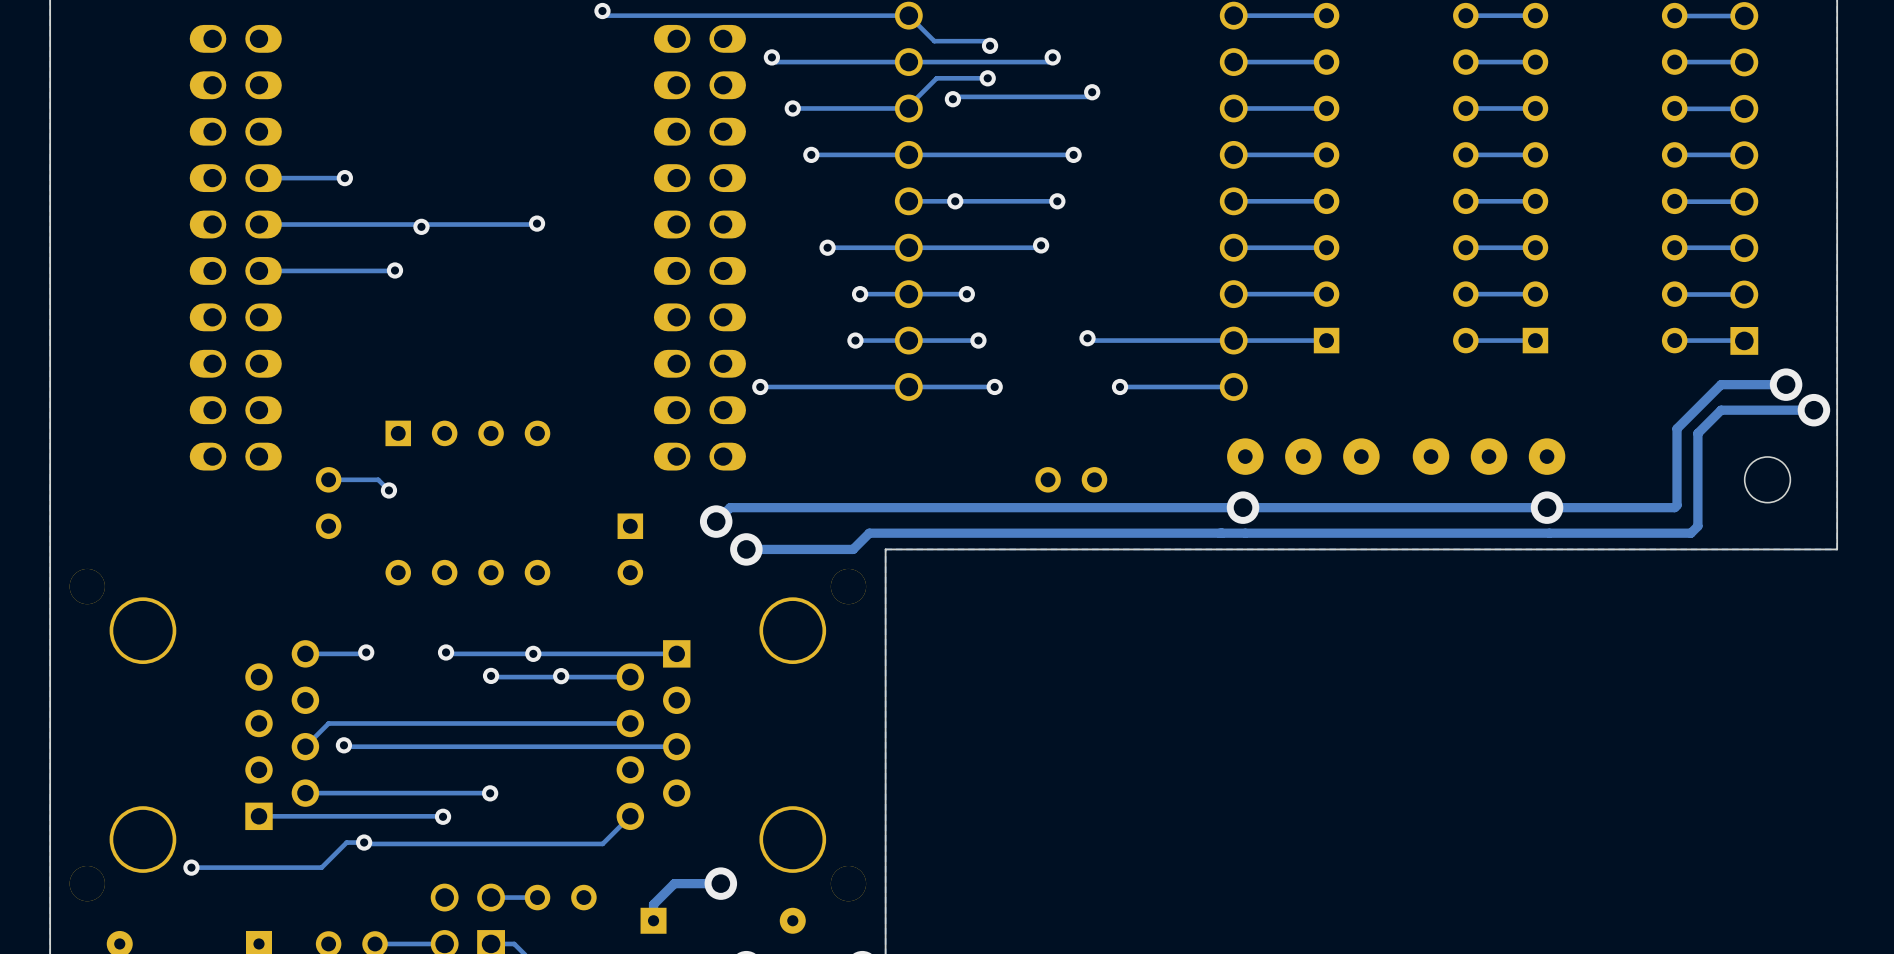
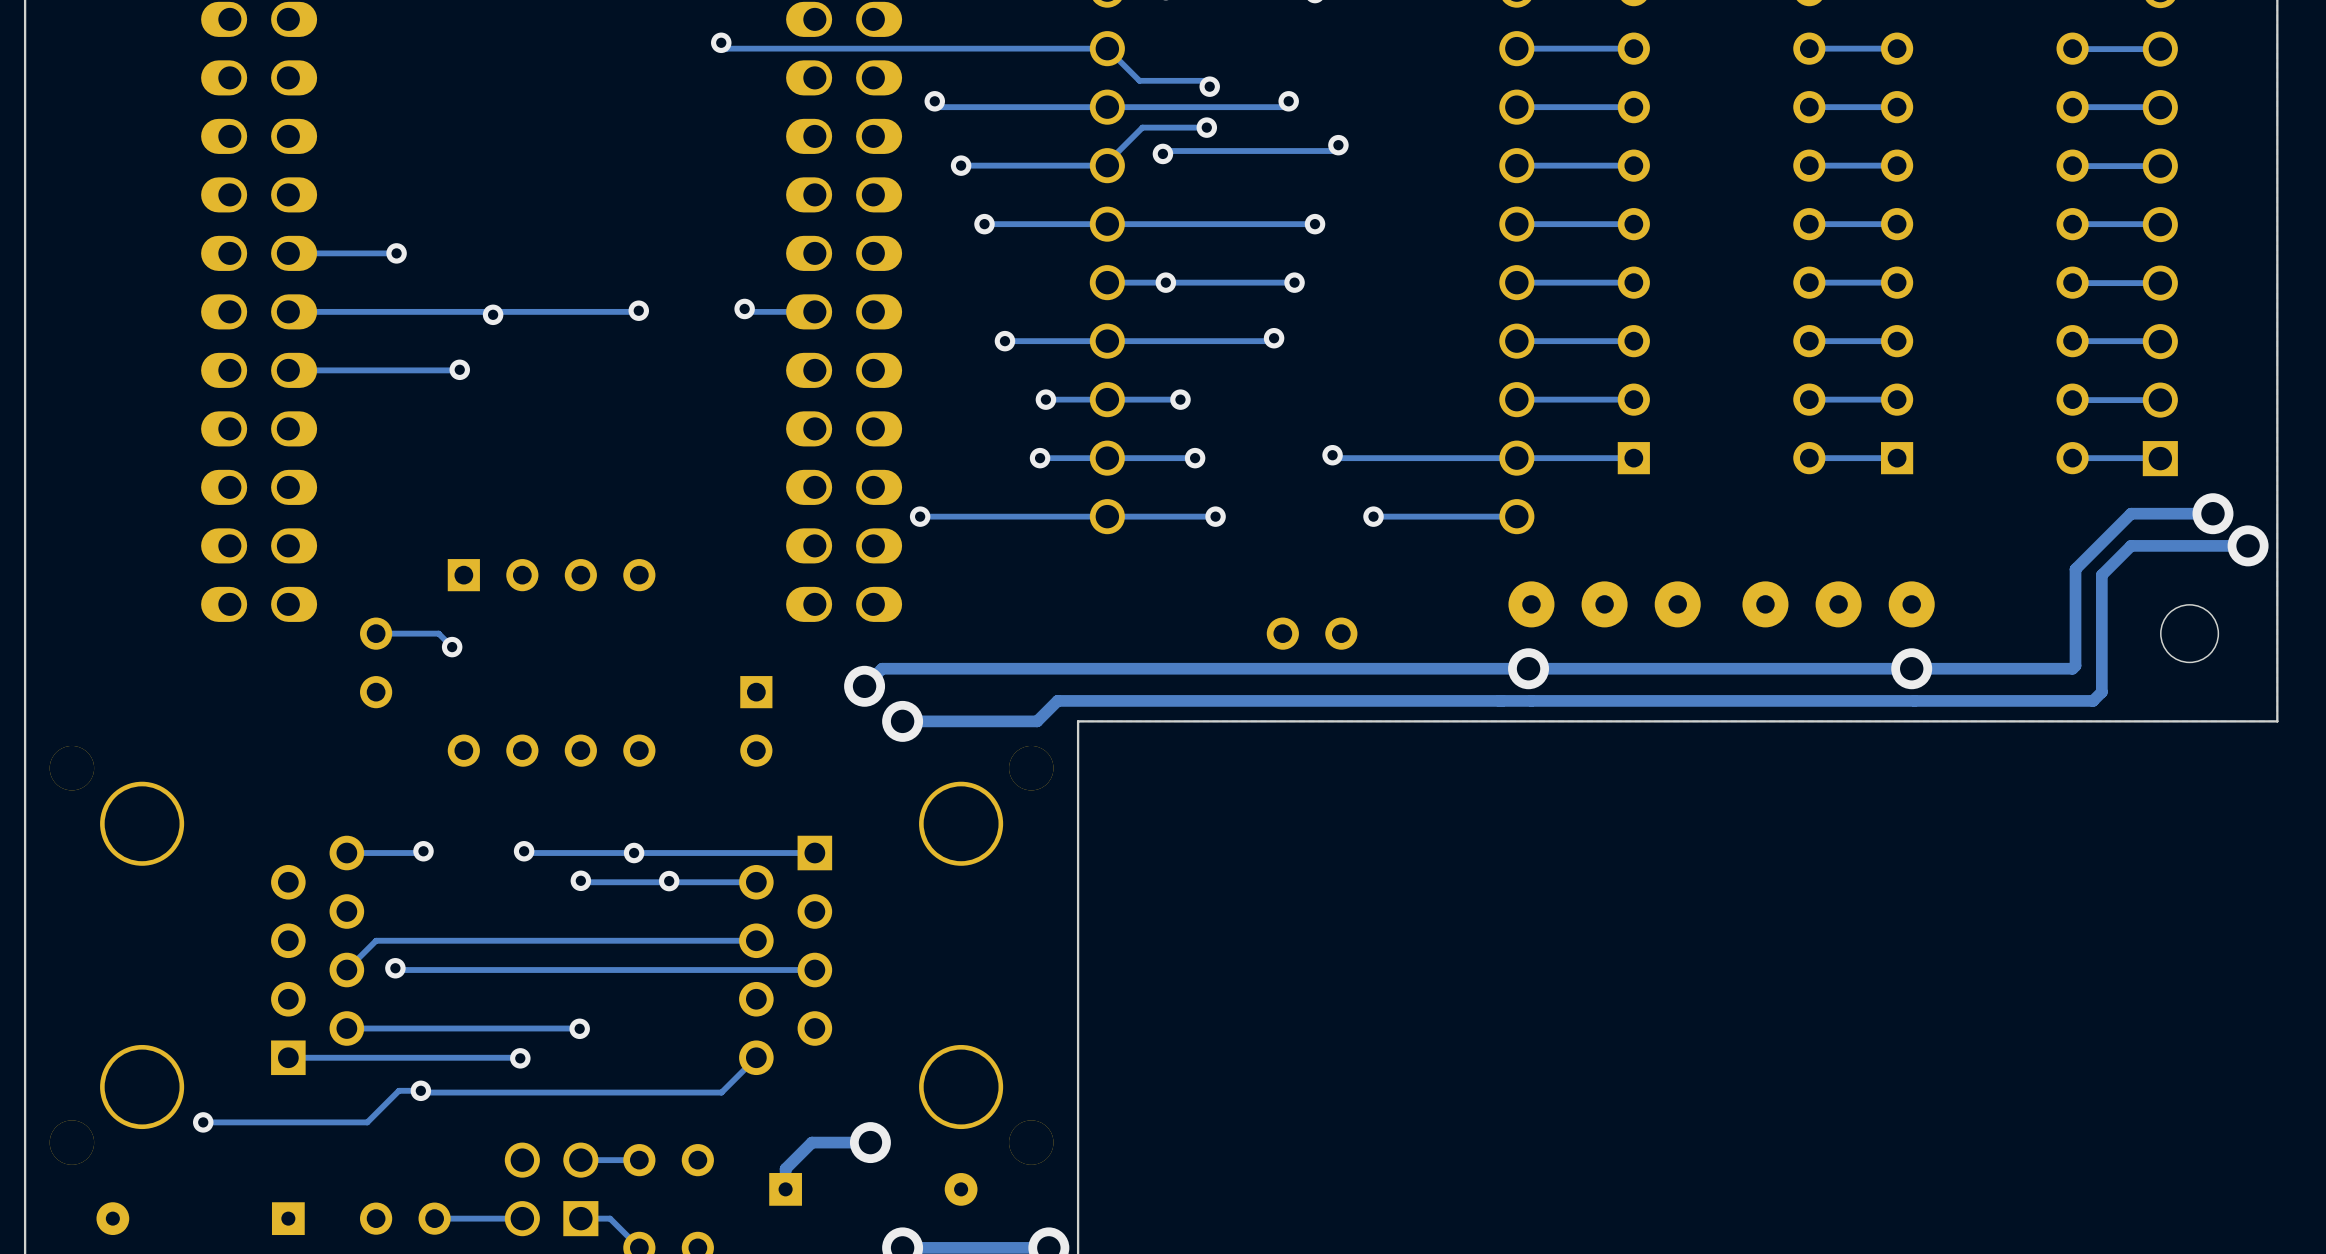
track: none -> (744, 308) (747, 311) (814, 311)
via: none -> (744, 308)

